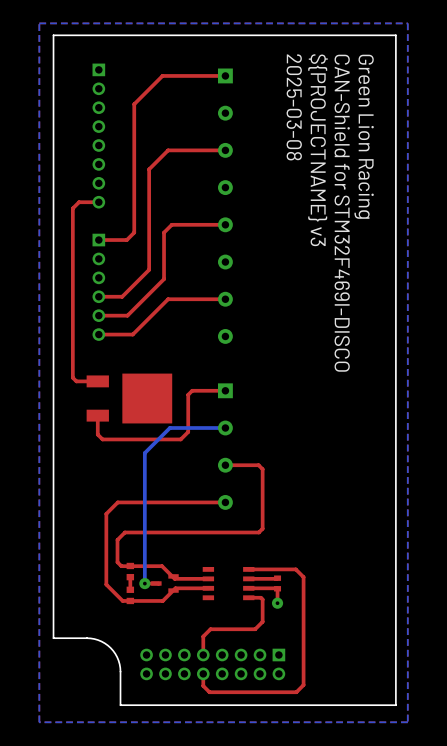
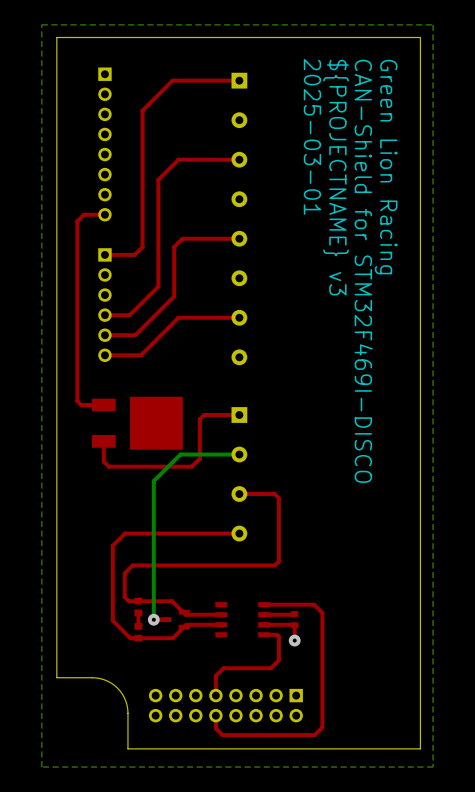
text: 2025-03-08 (294, 107) -> 2025-03-01 (312, 136)

